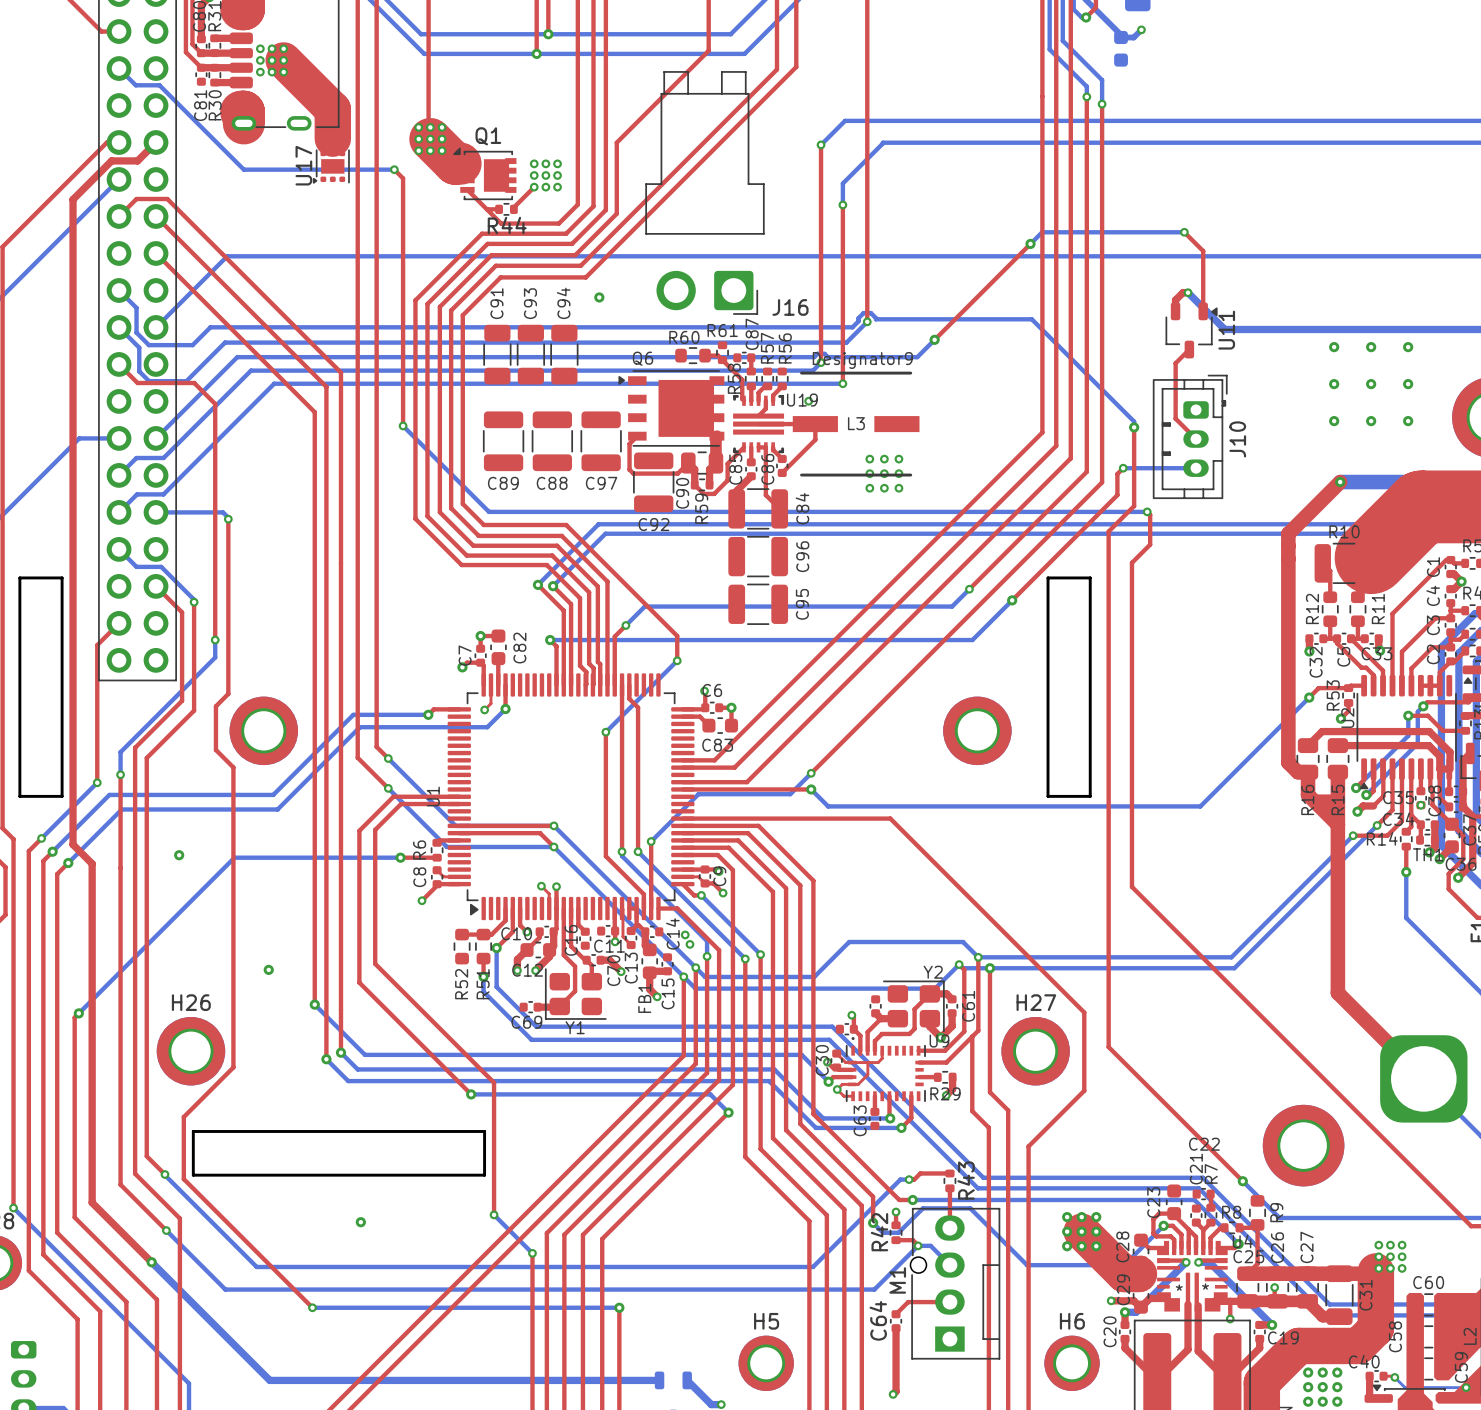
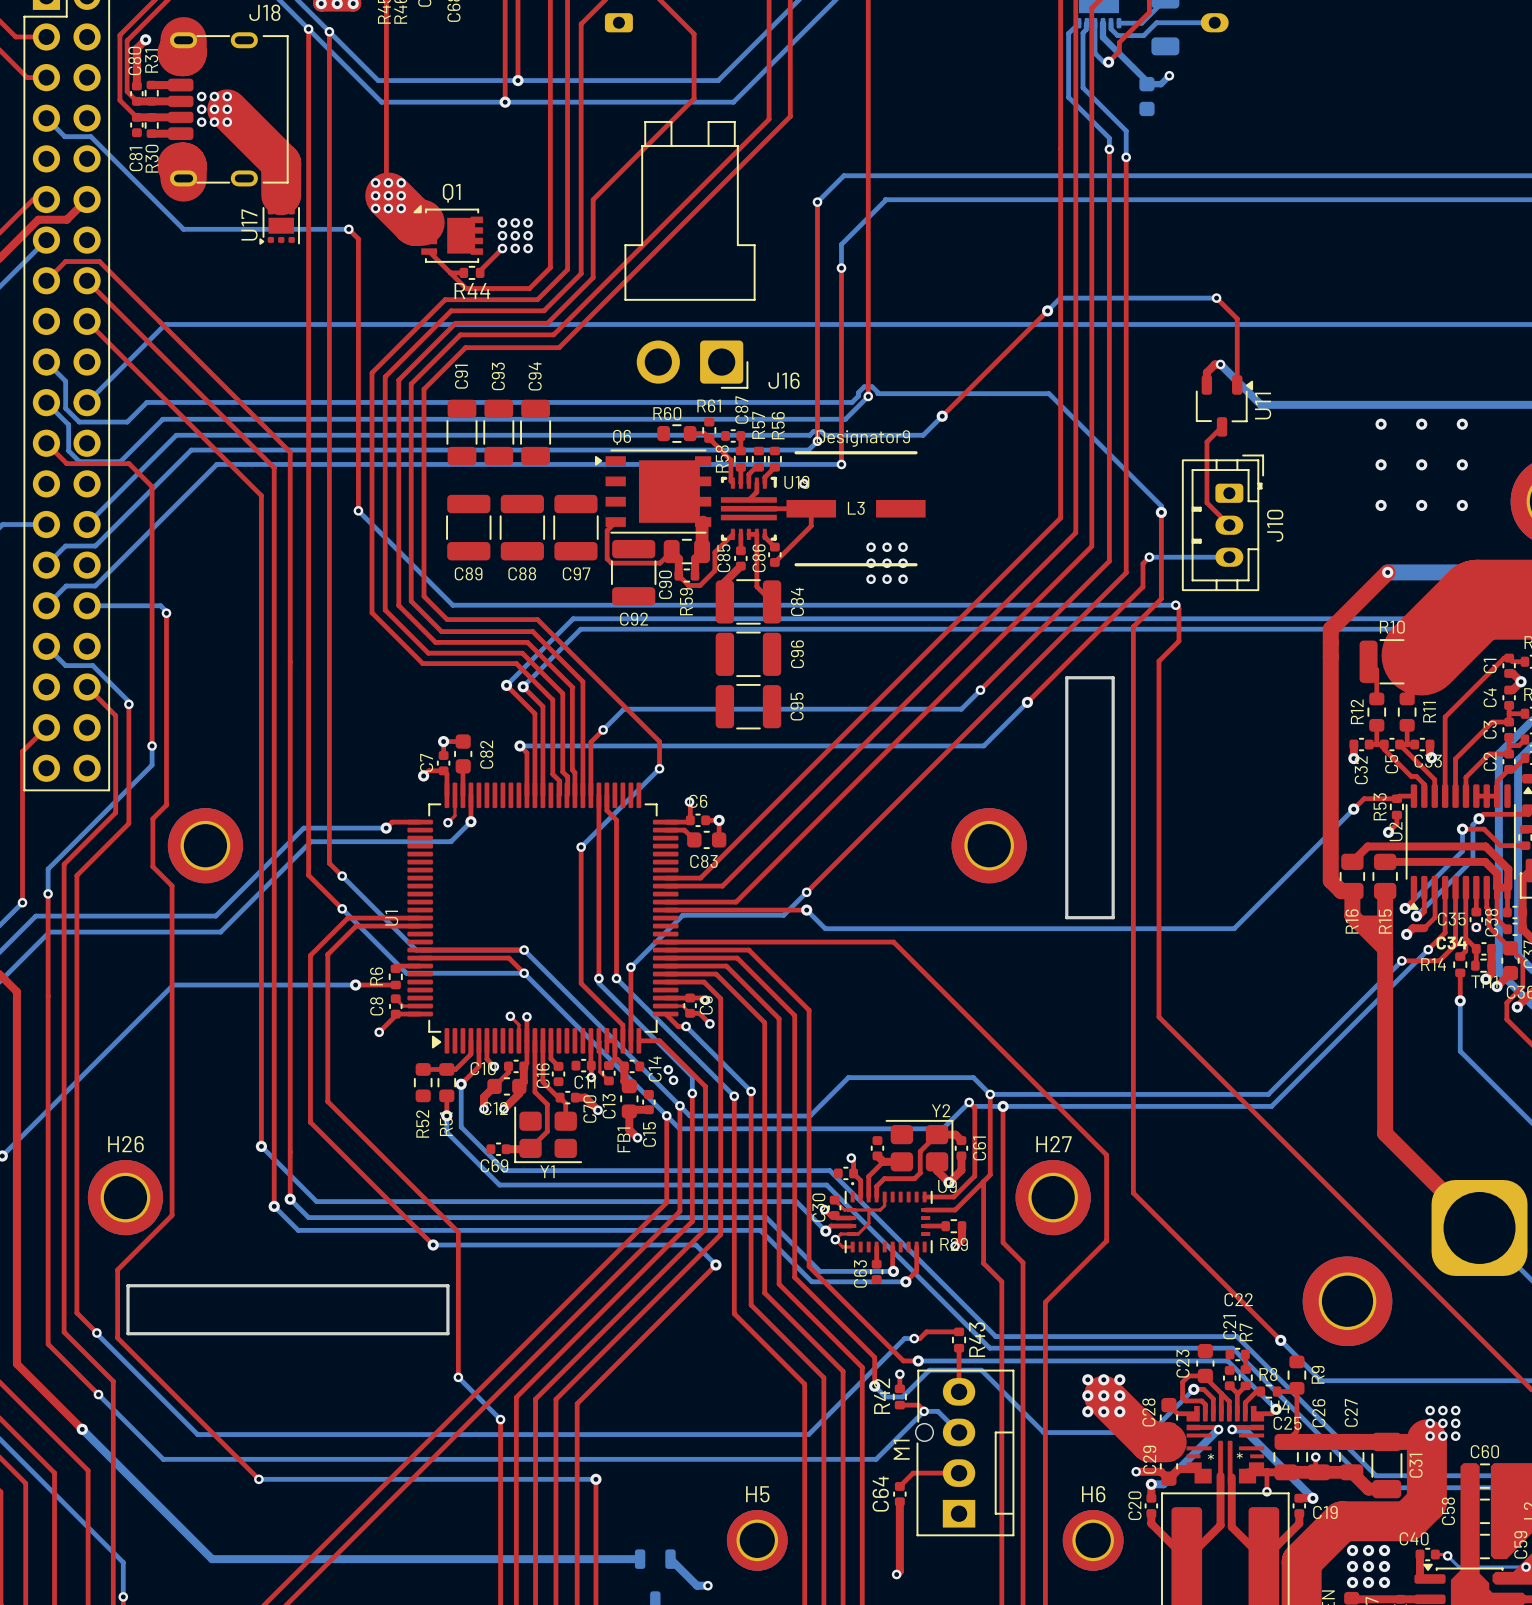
via: (599, 297) -> none
via: (179, 855) -> none
via: (268, 969) -> none
via: (360, 1222) -> none

